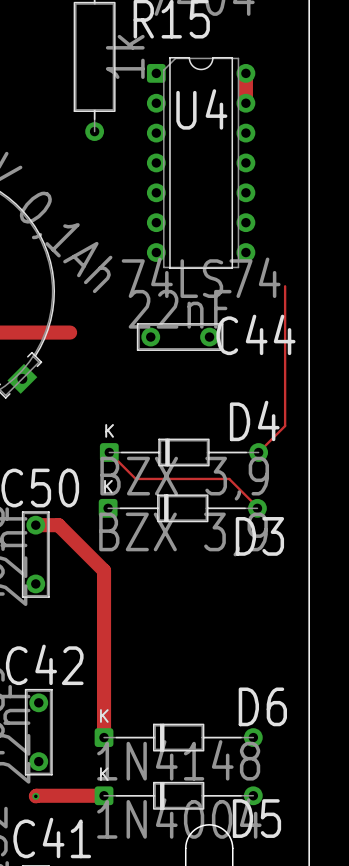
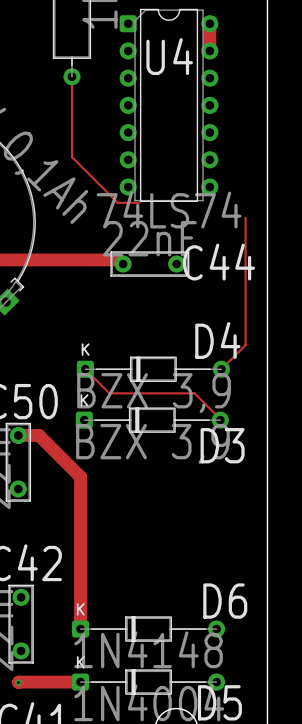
track: none -> (71, 76) (71, 157) (117, 202) (139, 202)
track: none -> (49, 259) (119, 259) (123, 264)

